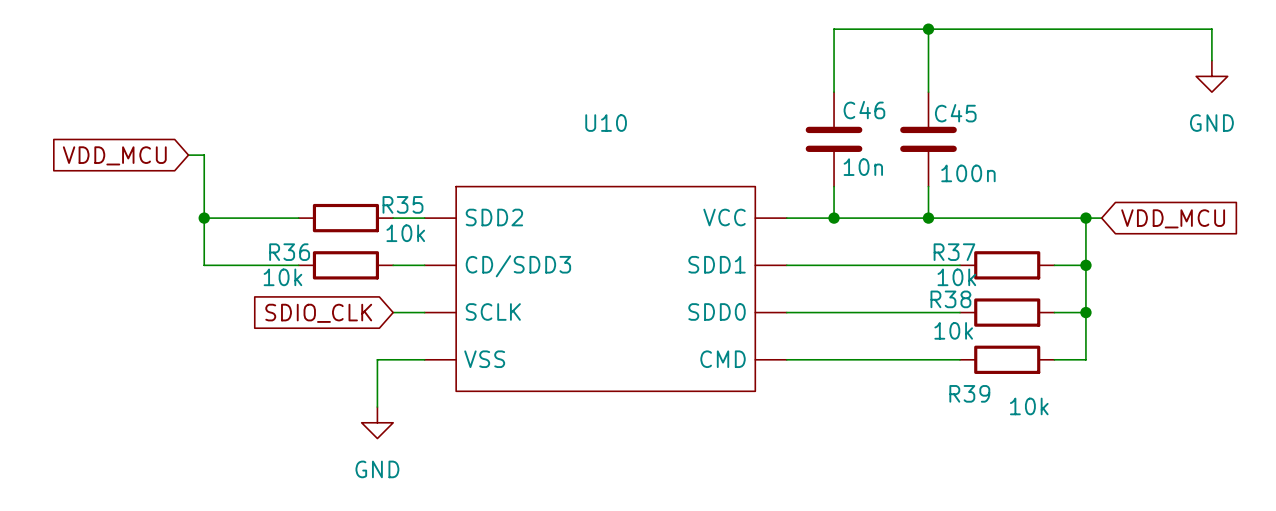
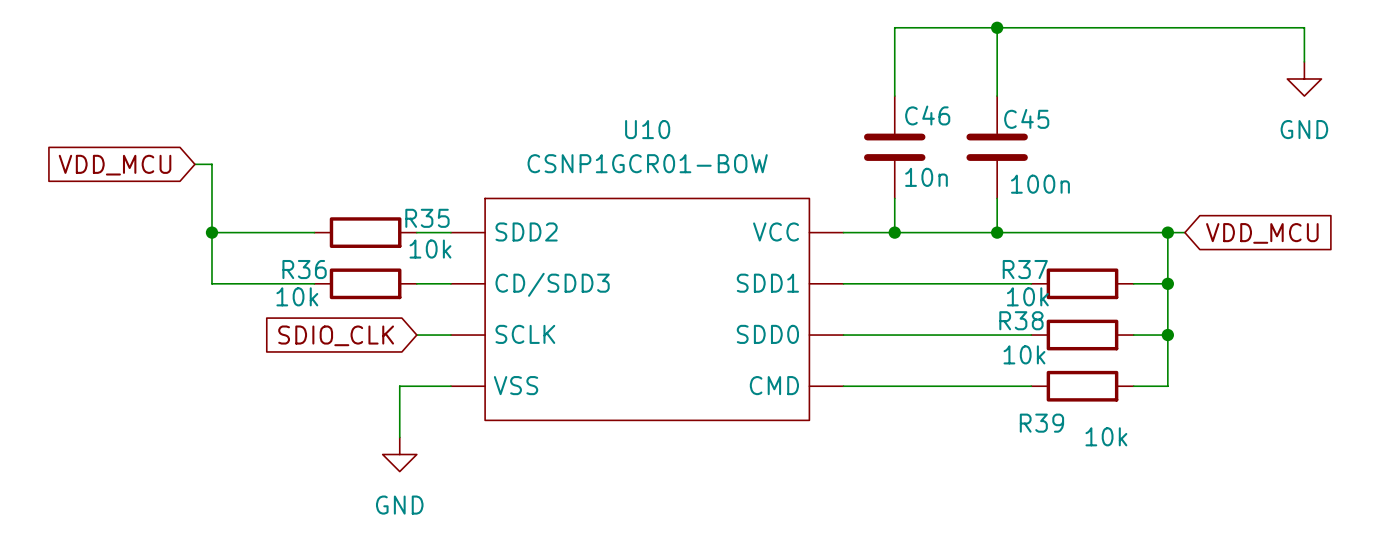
U10 value: none -> CSNP1GCR01-BOW (647, 163)

